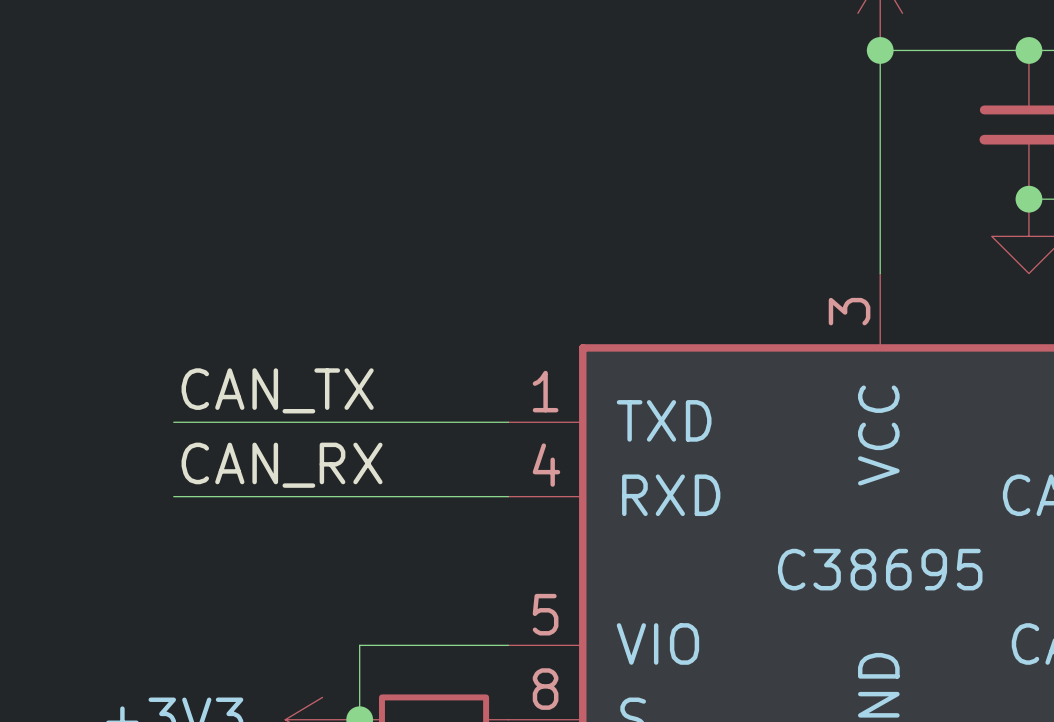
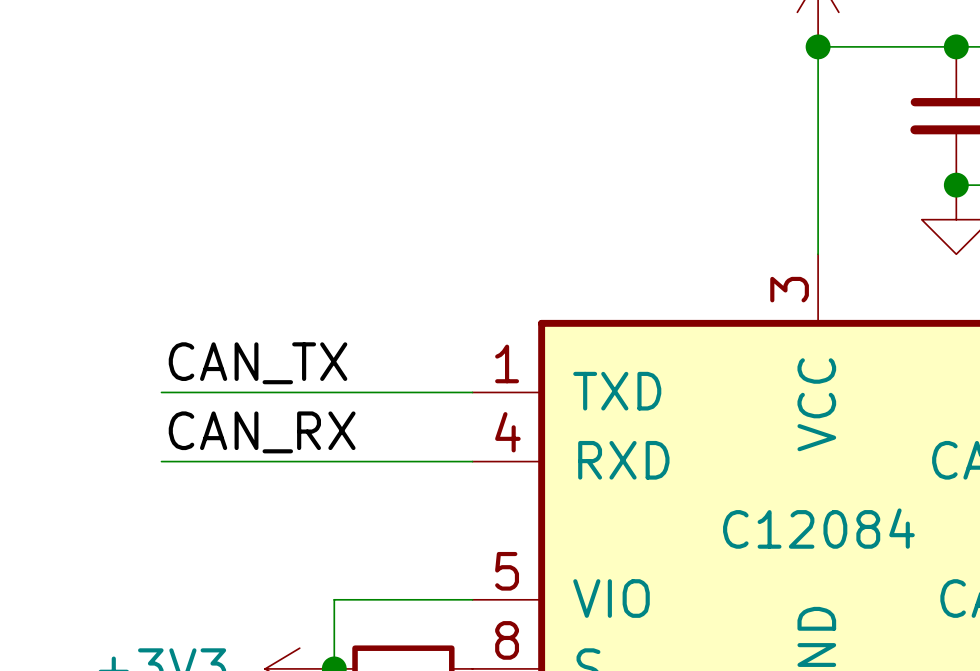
part text: C38695 (880, 569) -> C12084 (818, 528)

